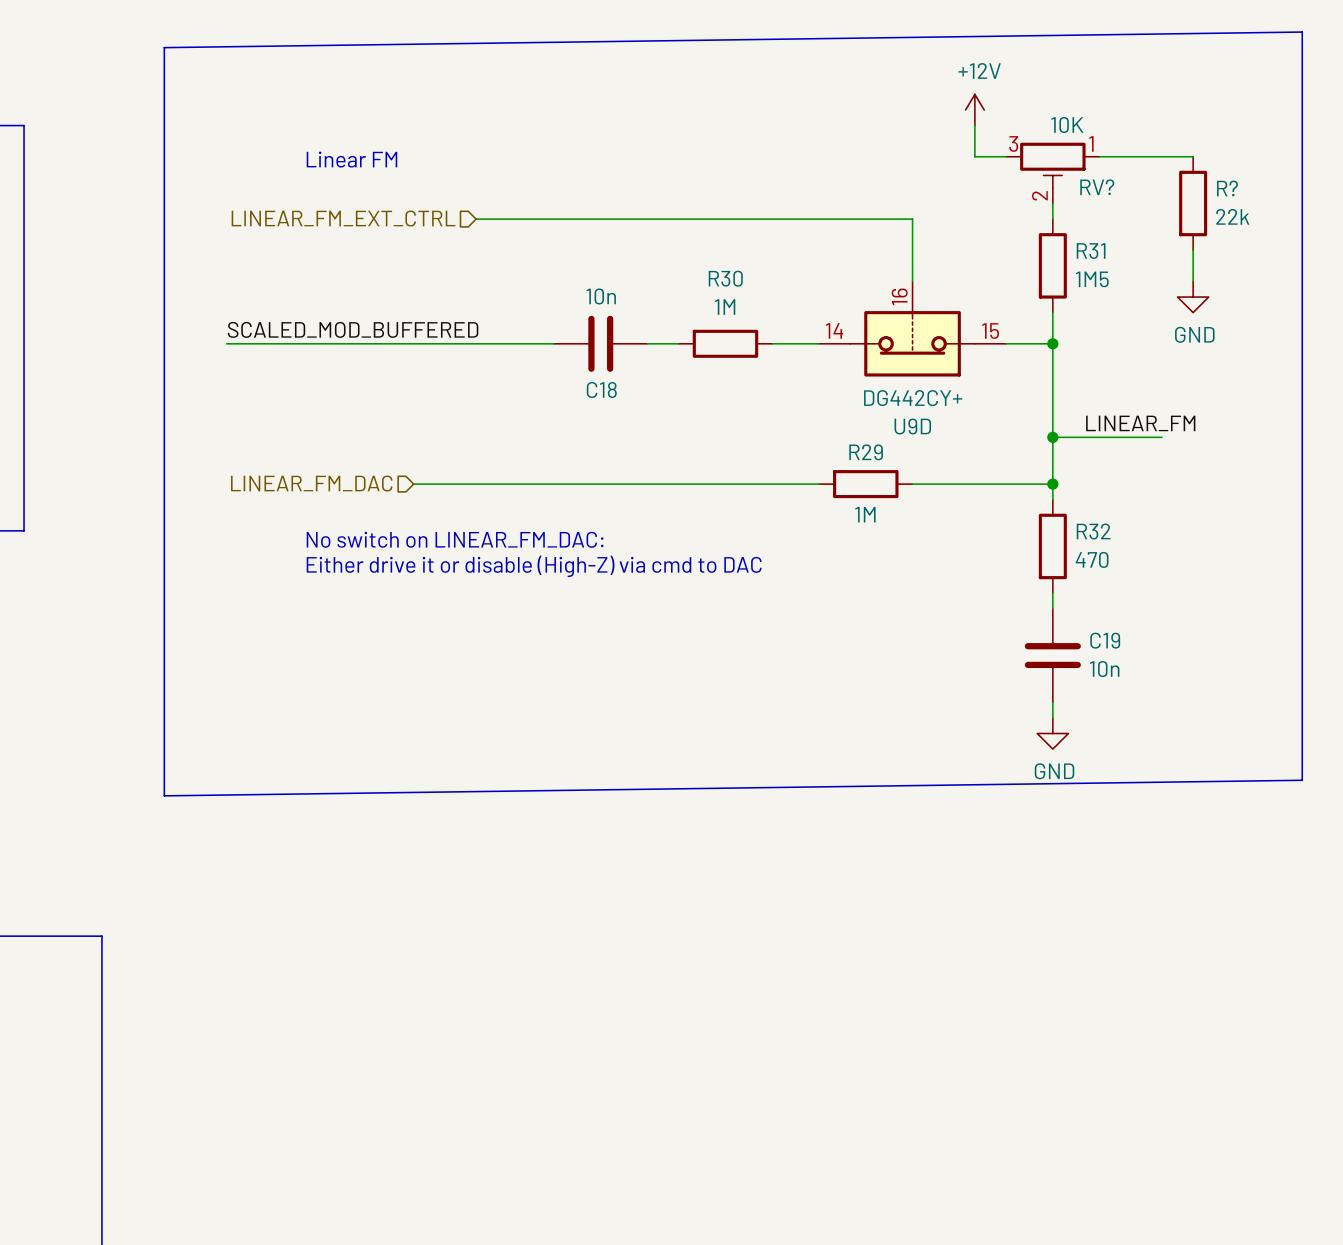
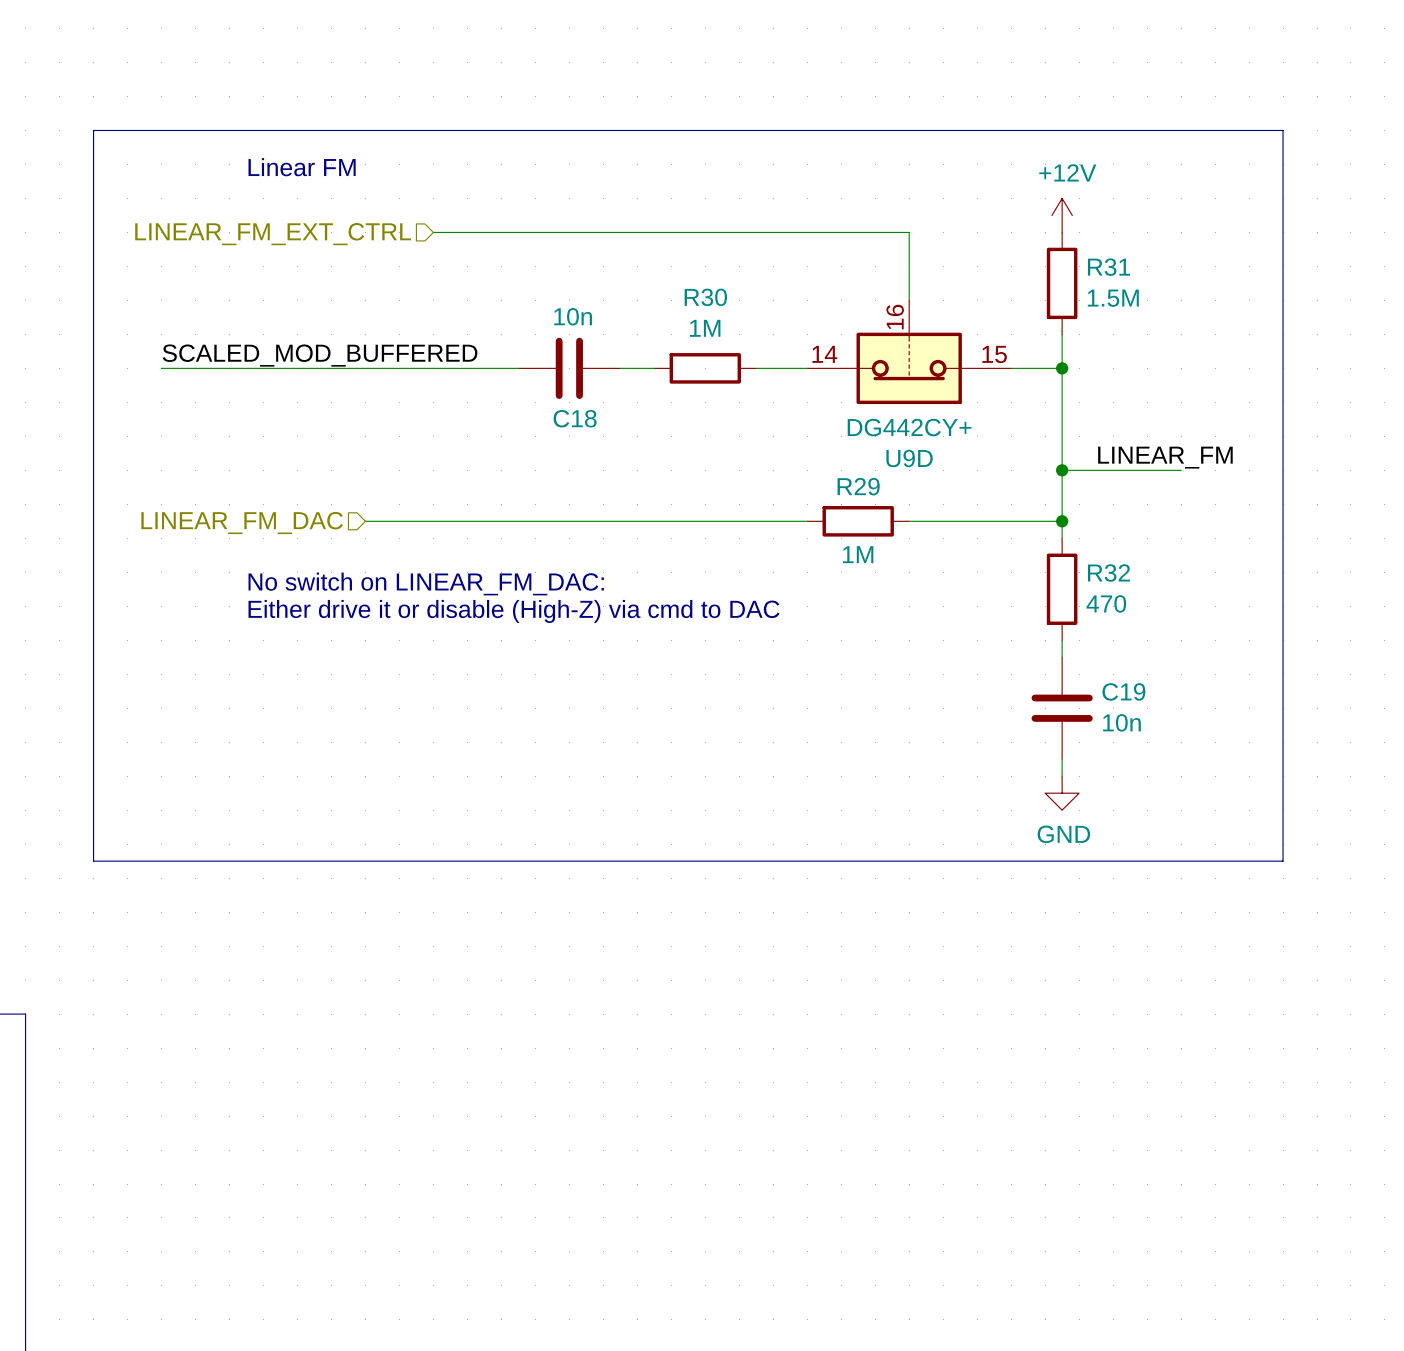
power symbol position: +12V (974, 109) -> +12V (1062, 215)
line: (164, 125) (164, 47) (1302, 32) (1302, 780) (164, 795) -> (93, 130) (1283, 130) (1283, 861) (93, 861)
wire: (974, 125) (974, 156) (1006, 156) -> none
wire: (1099, 156) (1193, 156) -> none
RV?: 10K (1052, 173) -> none
R?: 22k (1193, 203) -> none
wire: (1193, 250) (1193, 281) -> none
R31 value: 1M5 (1092, 279) -> 1.5M (1113, 298)
power symbol: GND (1193, 297) -> none

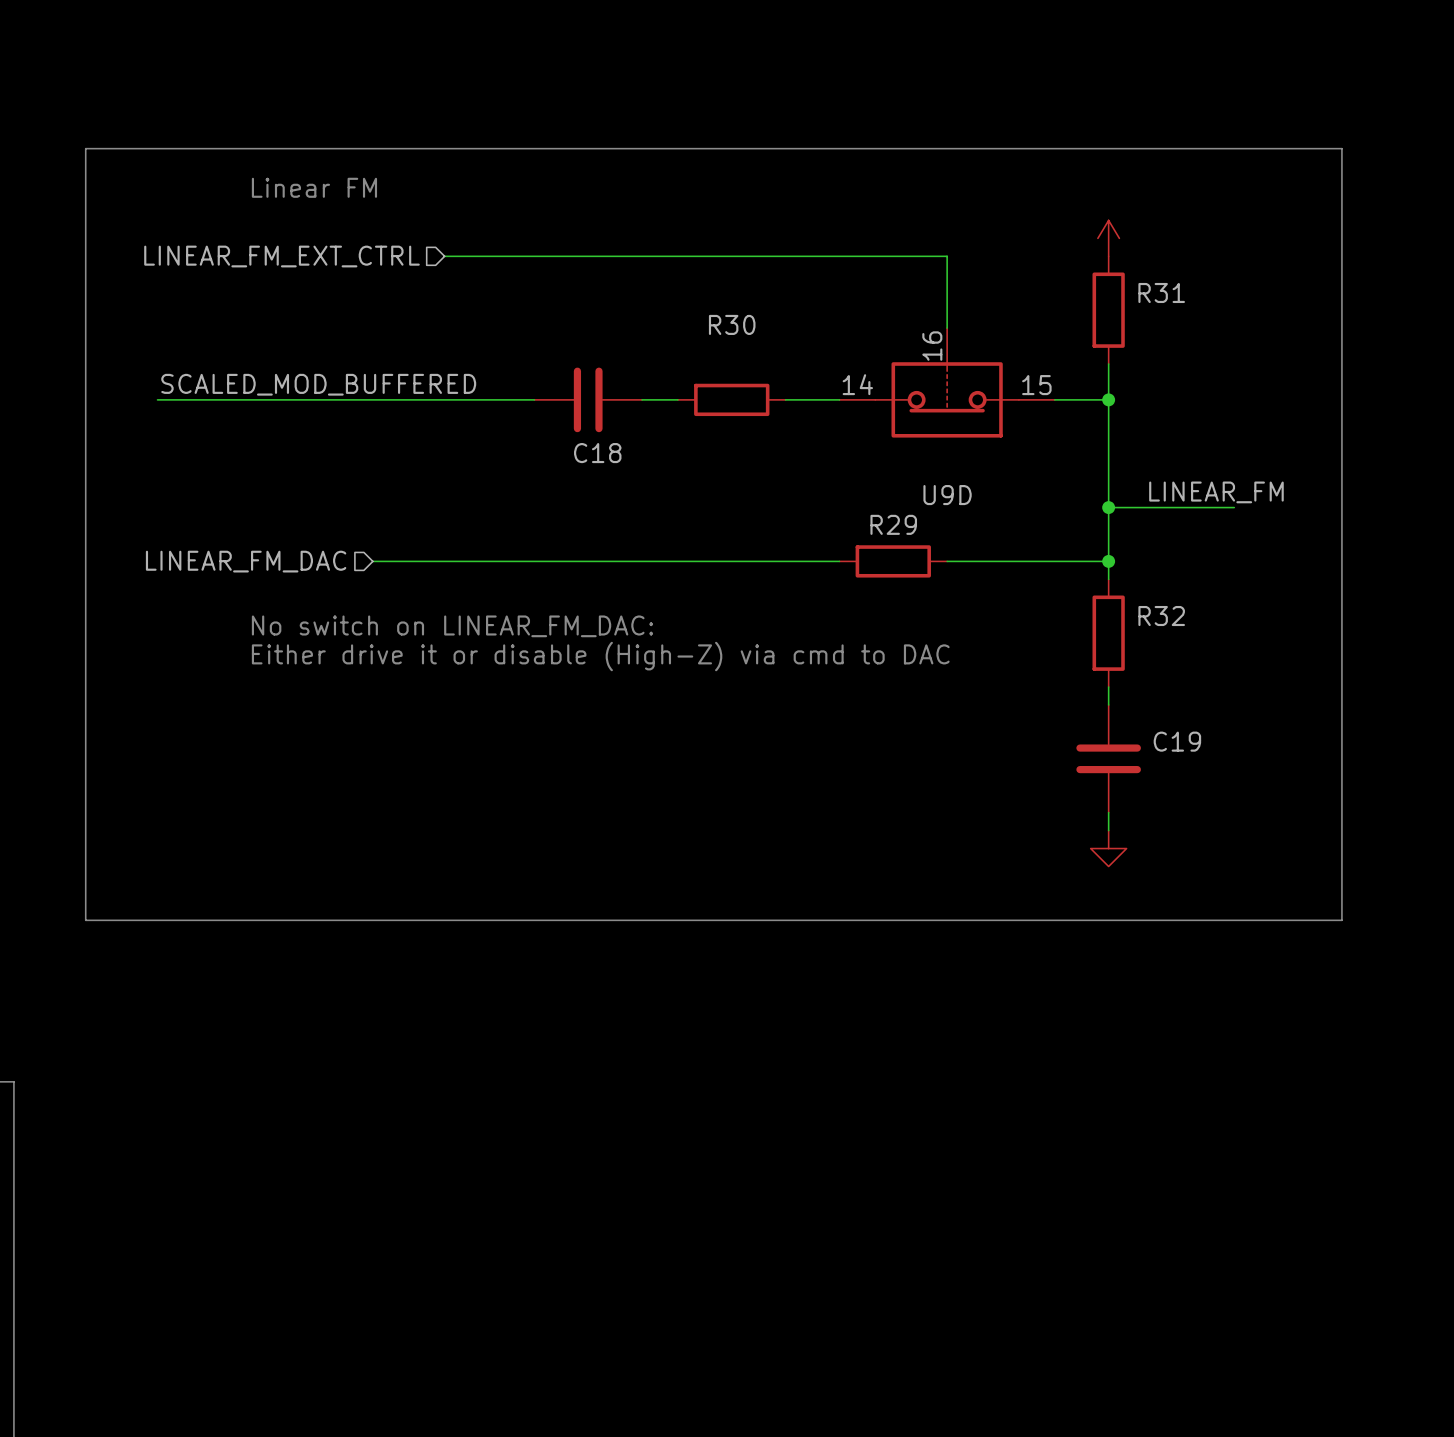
power symbol text: +12V (1067, 172) -> none
R31 value: 1.5M (1113, 298) -> none
C18 value: 10n (573, 316) -> none
R30 value: 1M (705, 328) -> none
U9D value: DG442CY+ (909, 427) -> none
R29 value: 1M (858, 554) -> none
R32 value: 470 (1106, 603) -> none
C19 value: 10n (1121, 722) -> none
power symbol text: GND (1063, 834) -> none

